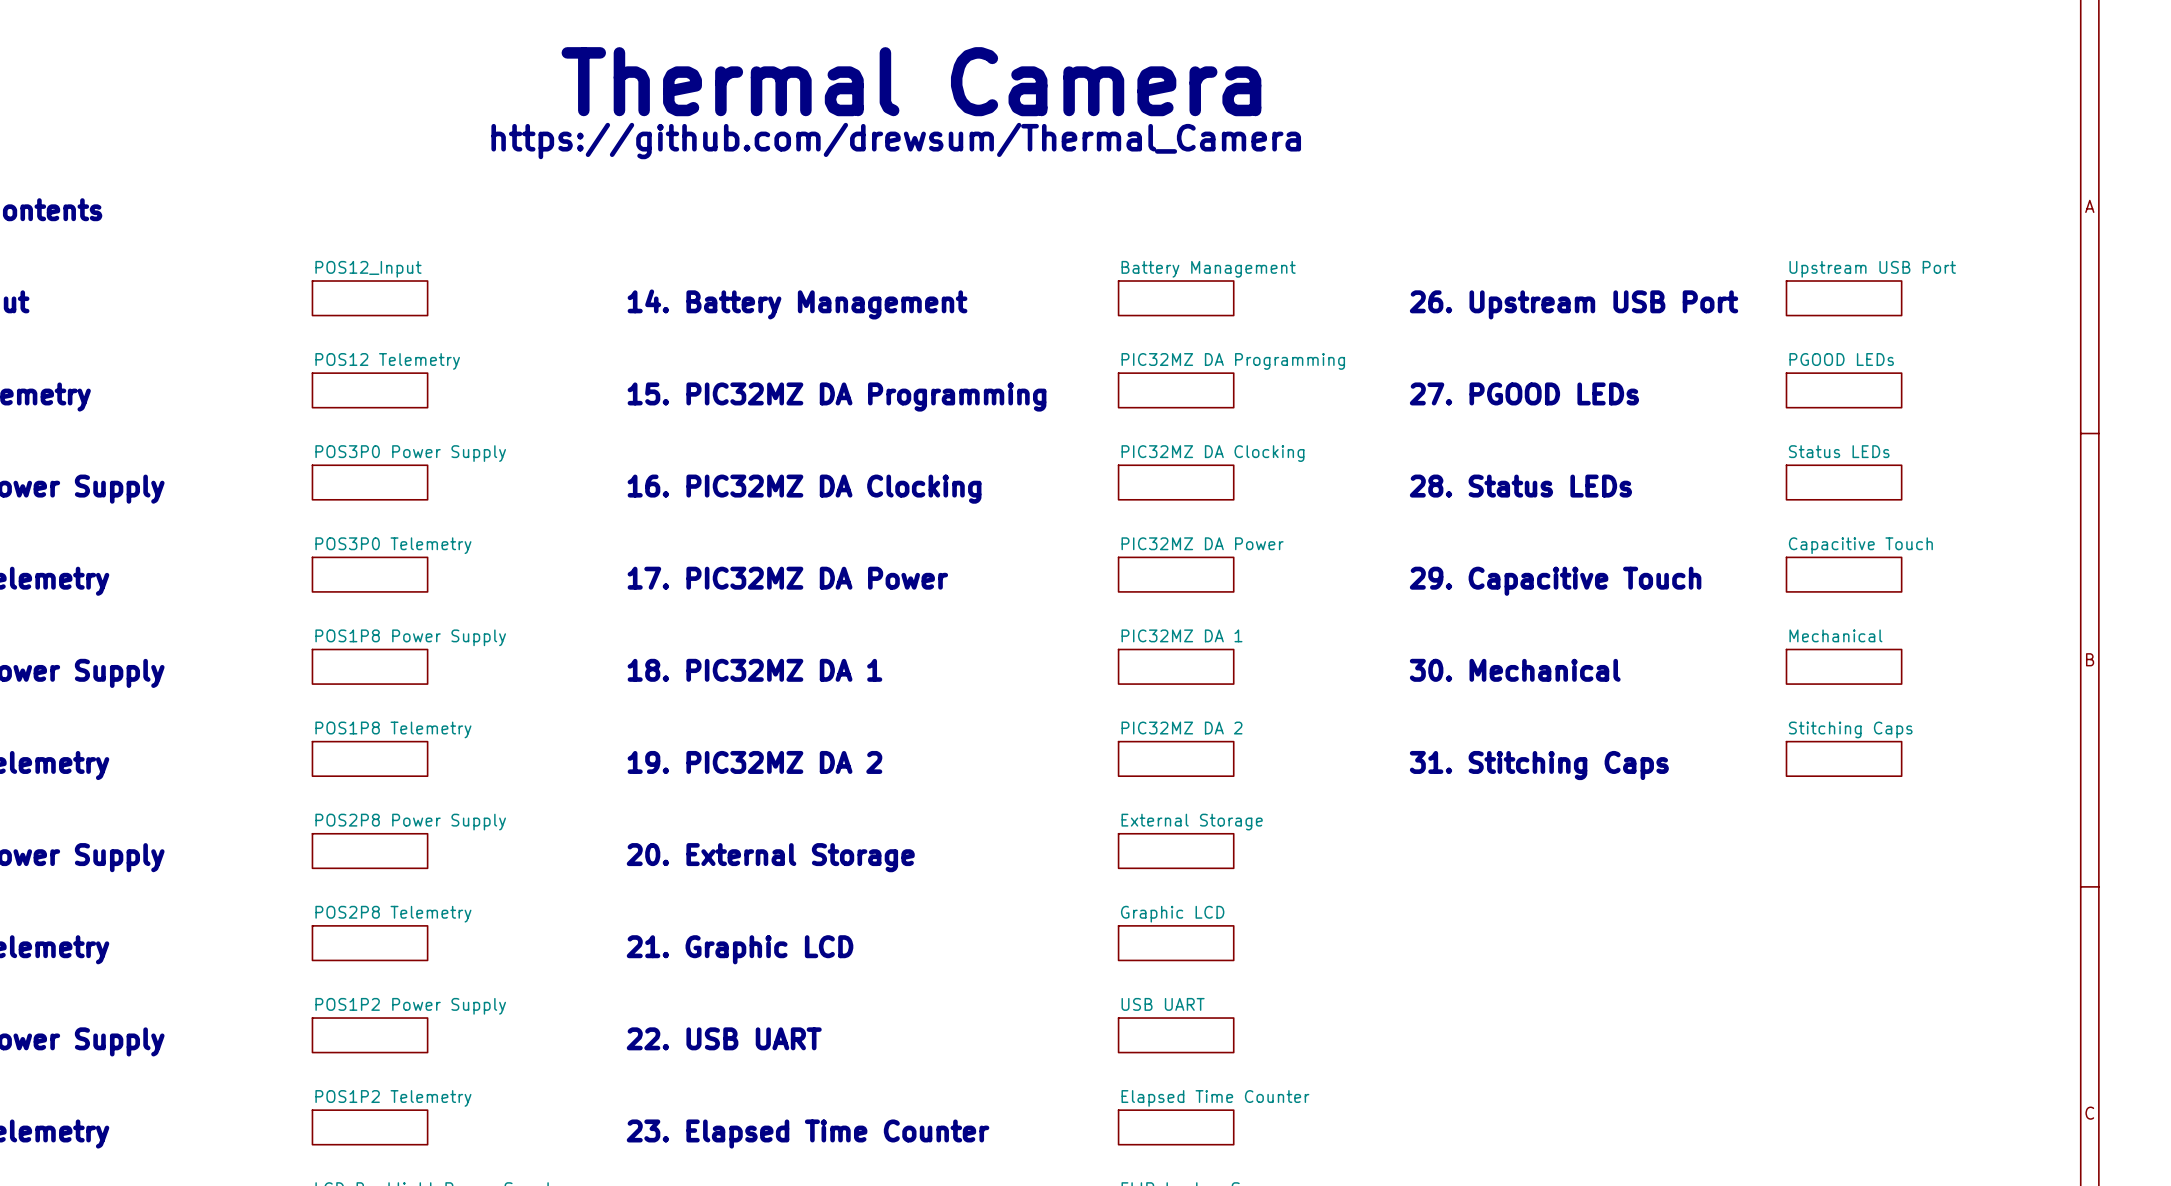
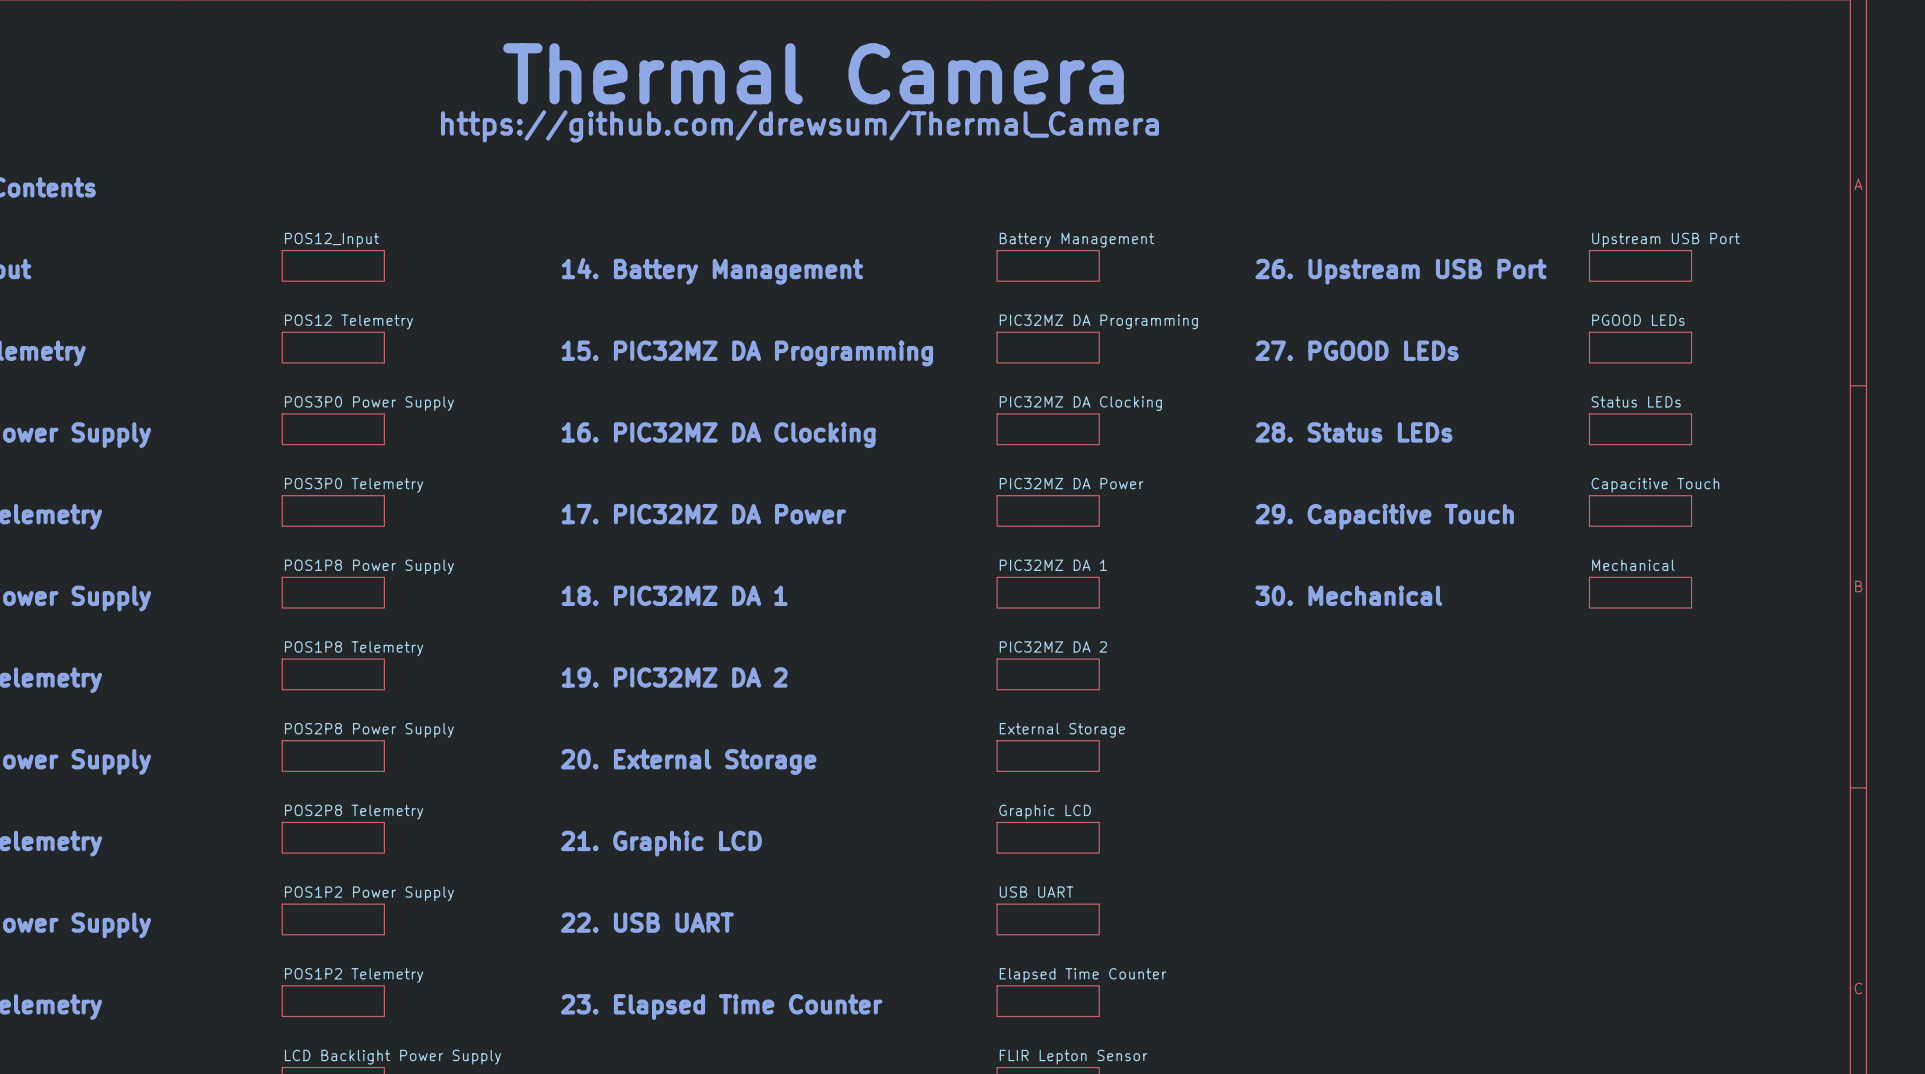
sheet Stitching Caps: (1844, 758) -> none
text: 31. Stitching Caps (1539, 765) -> none

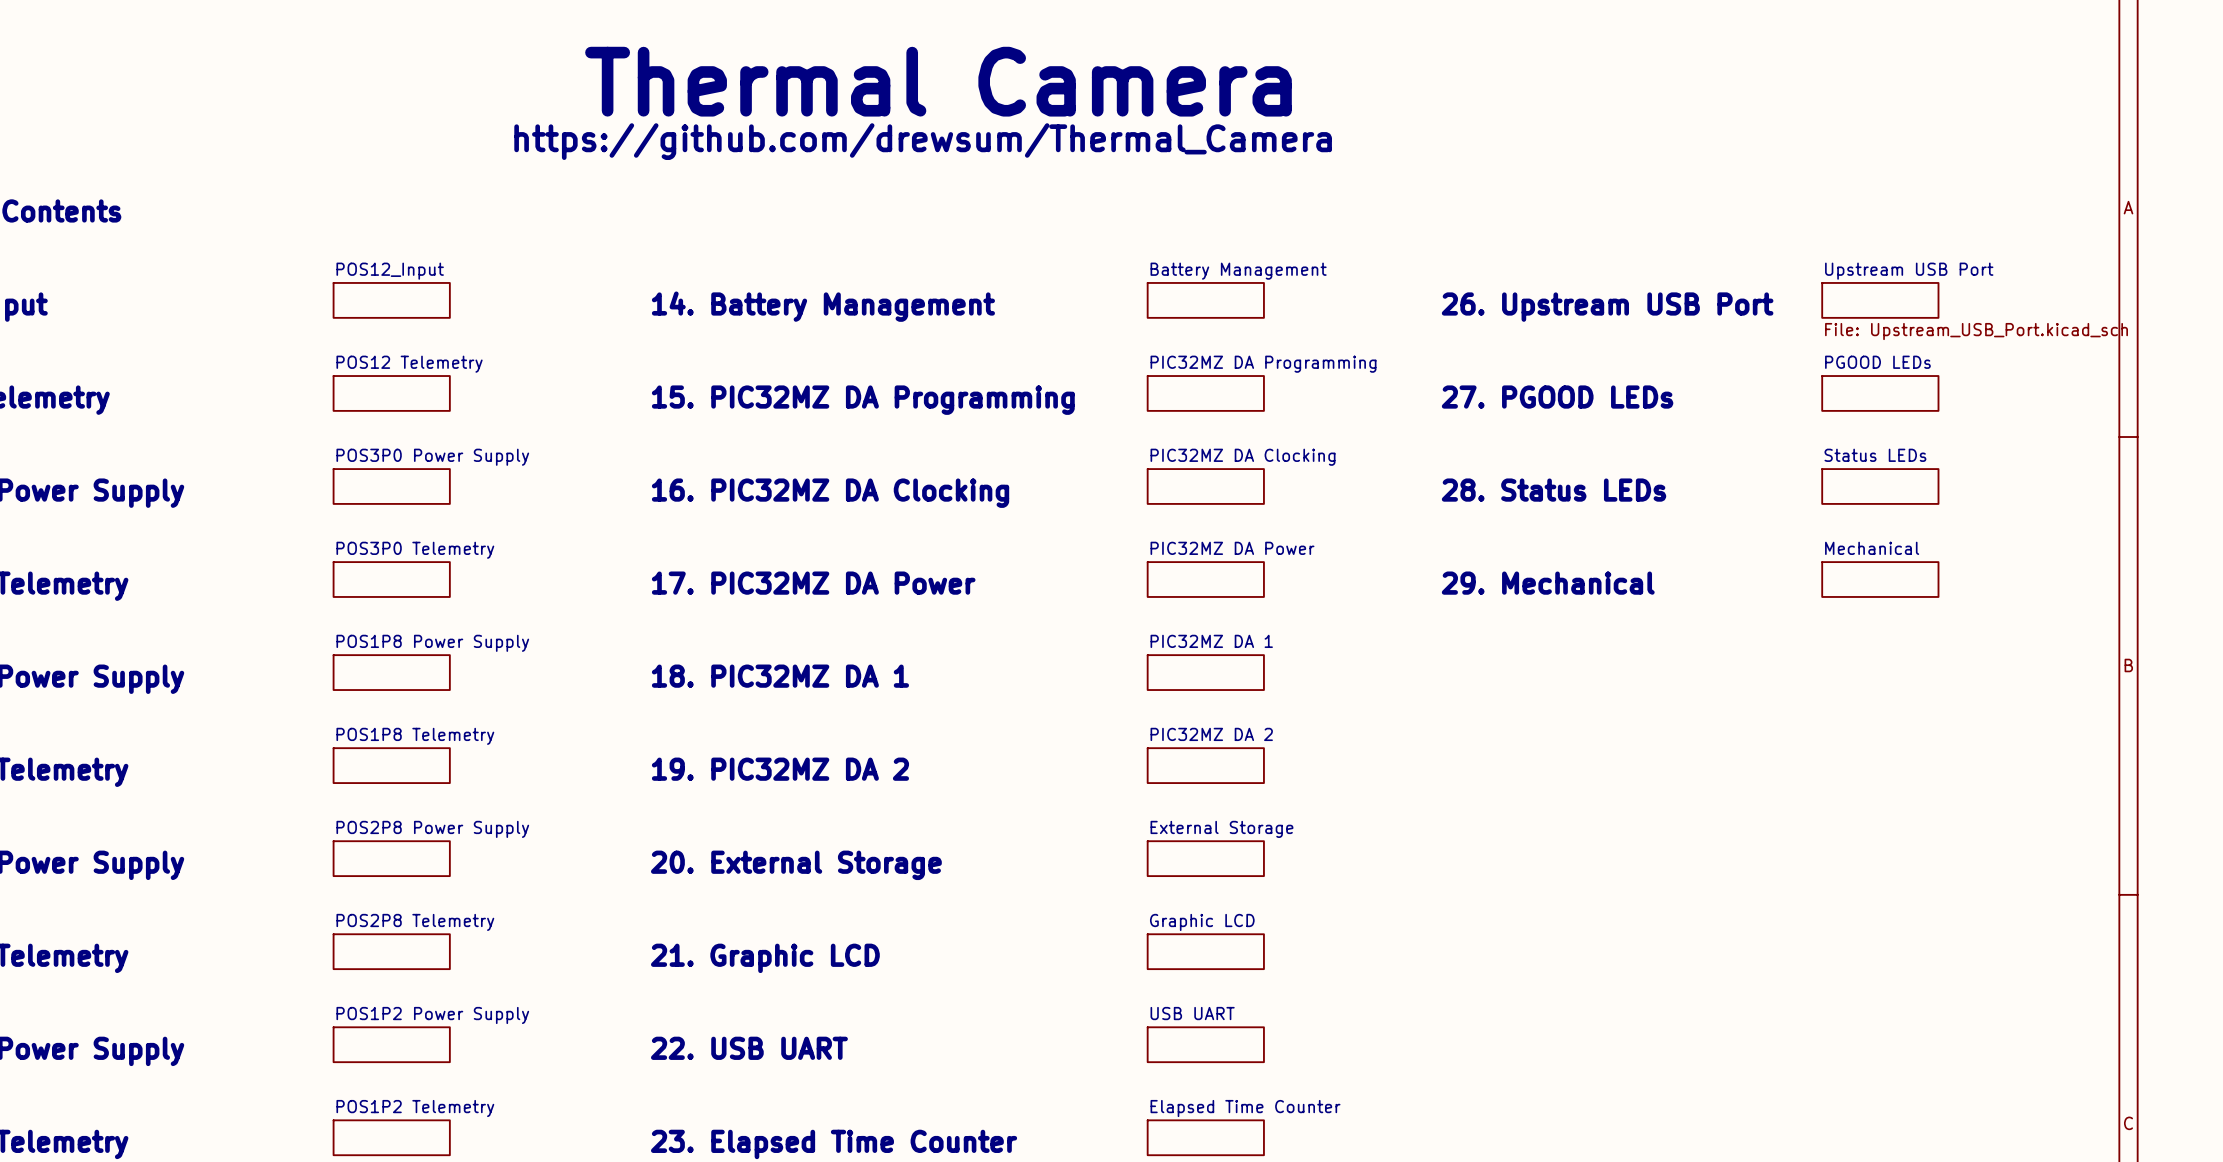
sheet Upstream USB Port value: none -> File: Upstream_USB_Port.kicad_sch (1976, 331)
sheet Capacitive Touch name: Capacitive Touch (1655, 485) -> Mechanical (1872, 548)
text: 29. Capacitive Touch (1384, 516) -> 29. Mechanical (1548, 583)
sheet Mechanical: (1640, 592) -> none
text: 30. Mechanical (1348, 595) -> none

